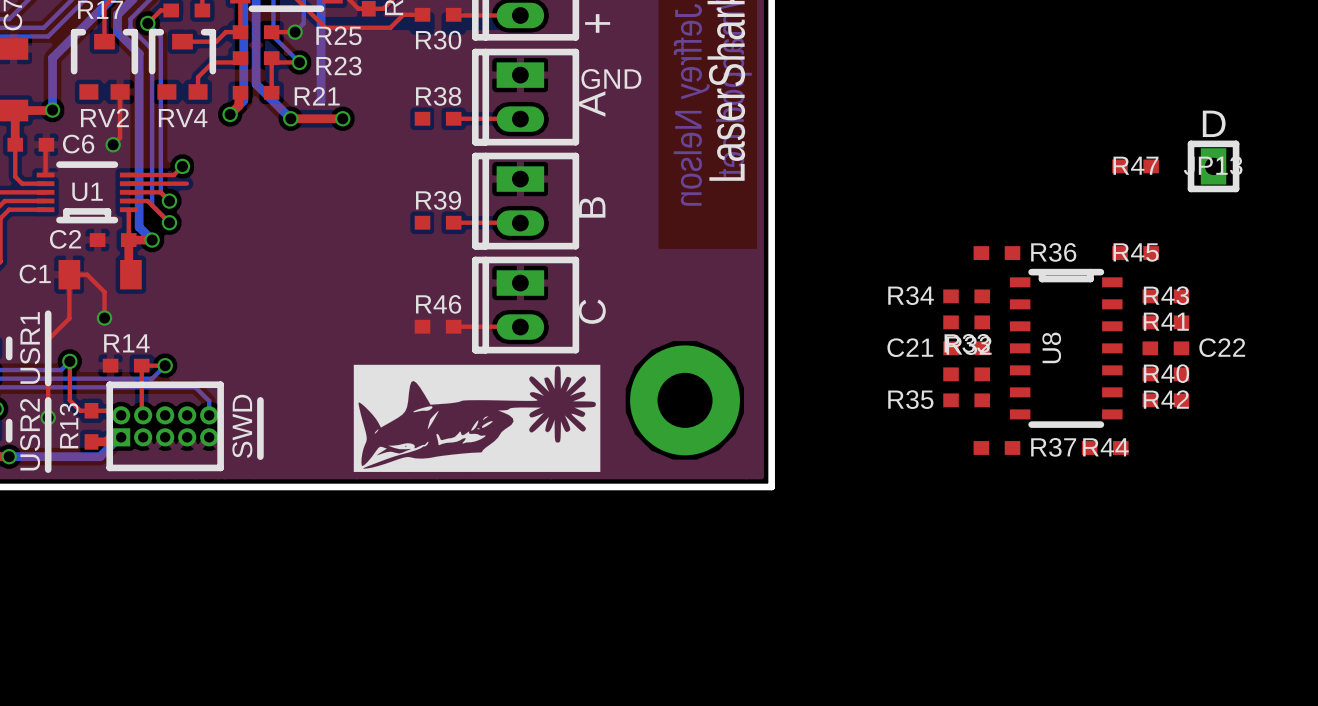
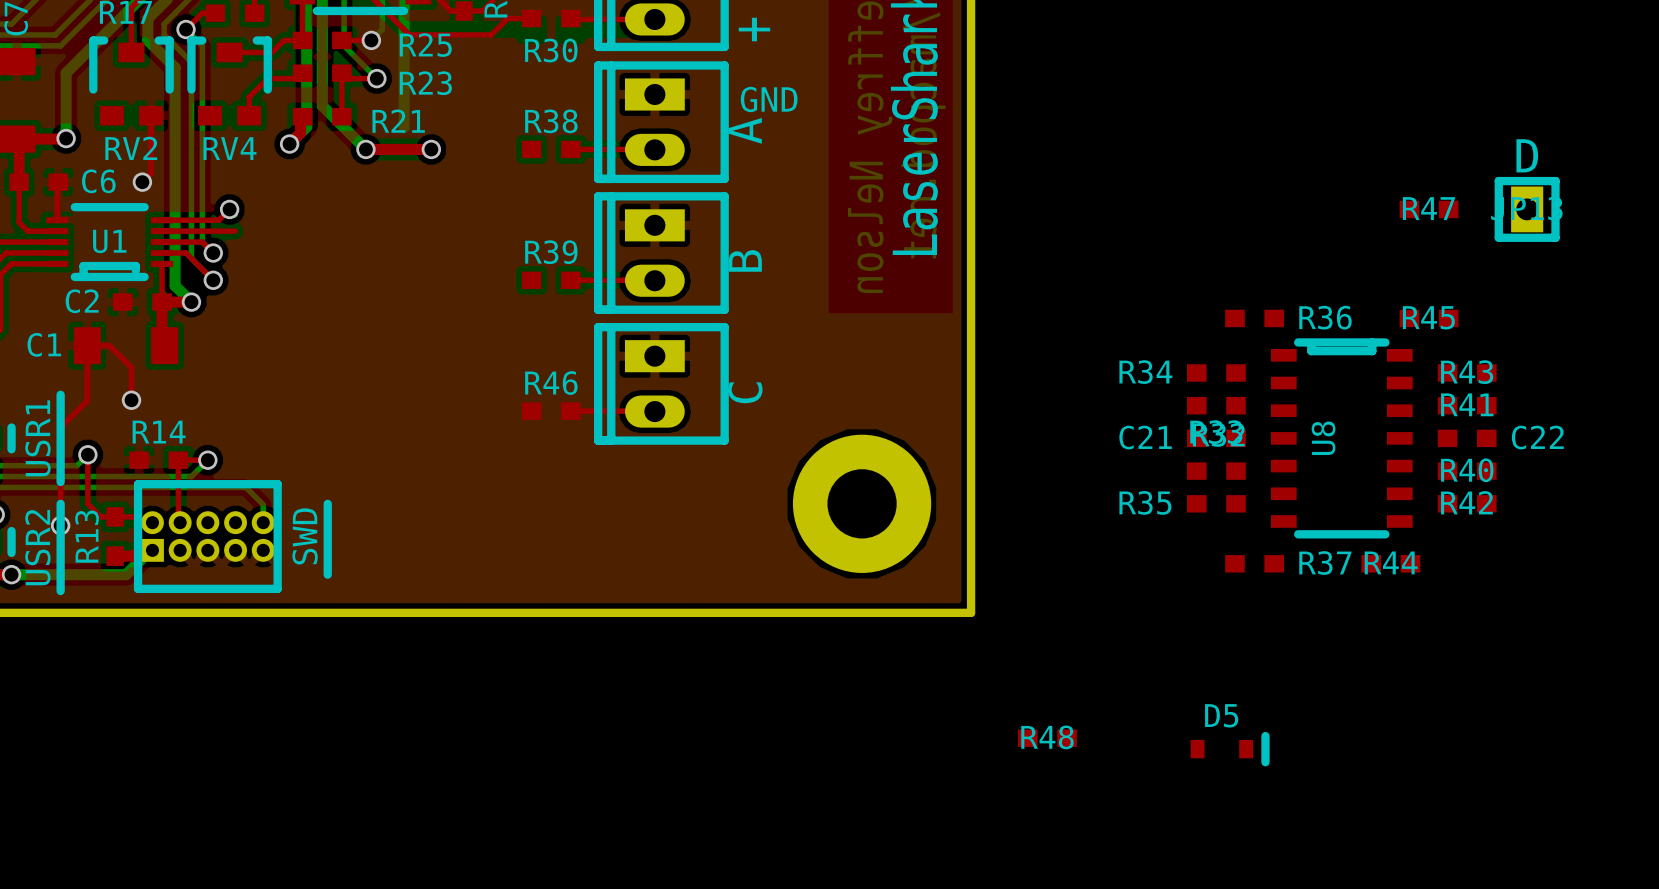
drawing: [353, 364, 601, 472] -> none
R48: none -> (1047, 738)
D5: none -> (1230, 749)

